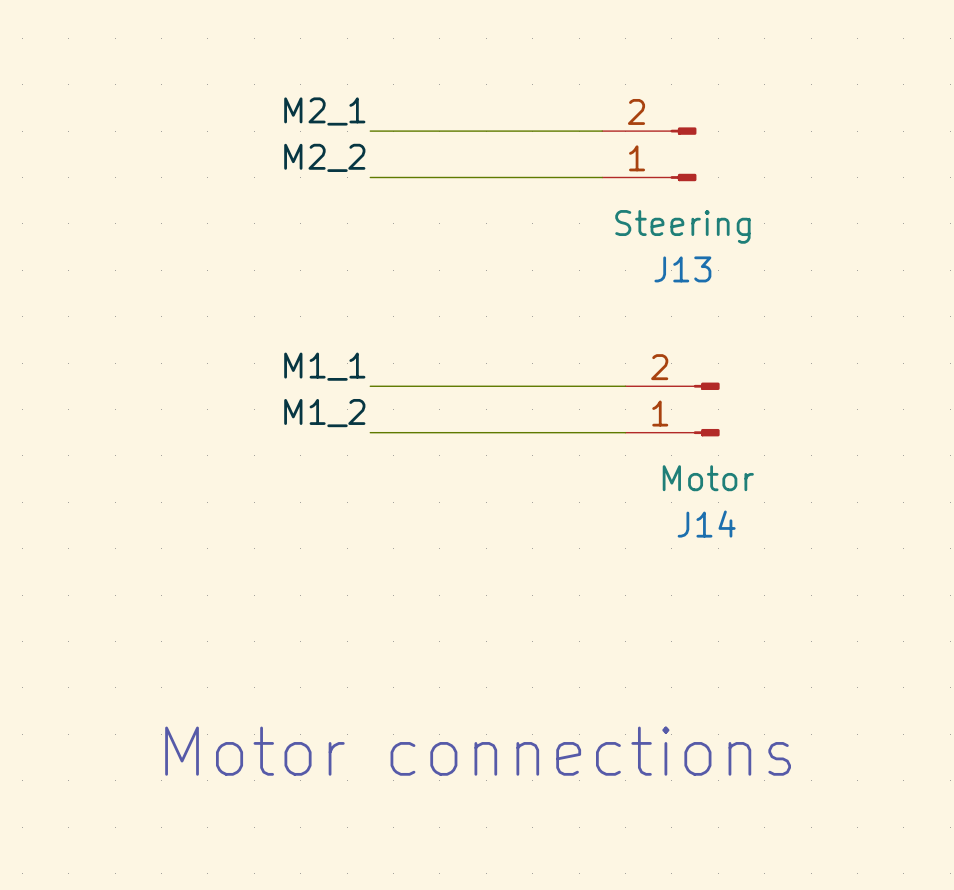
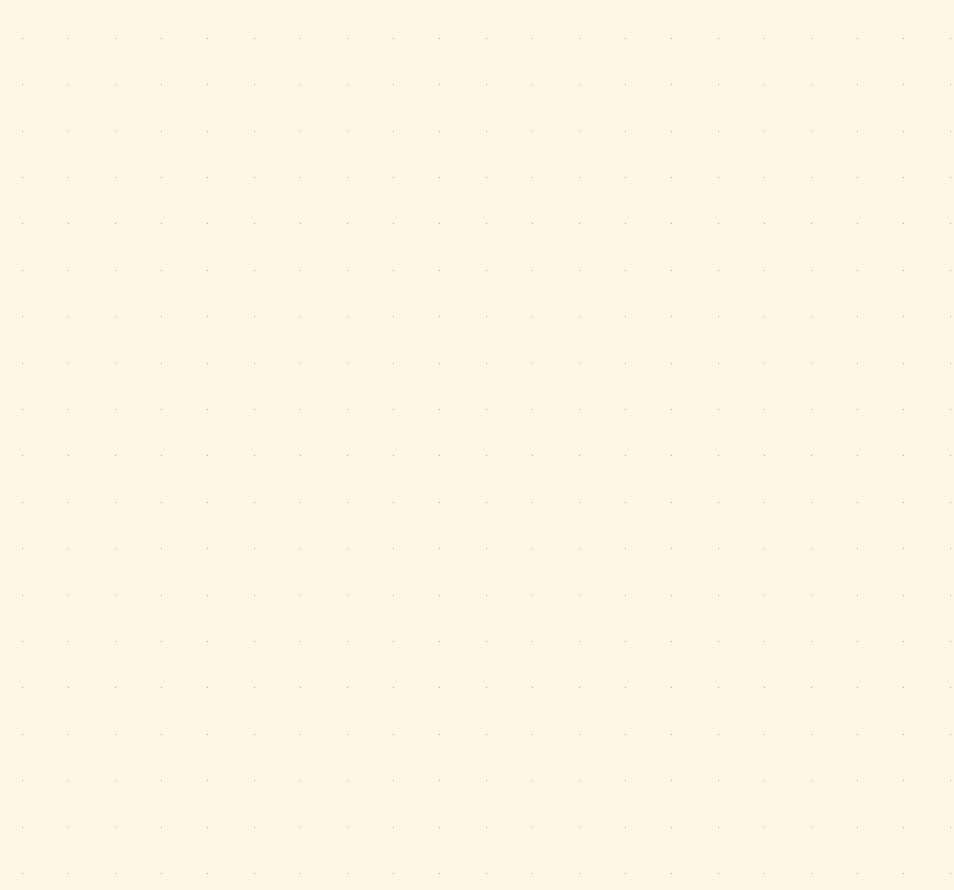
label: M2_1 (324, 111) -> none
wire: (370, 131) (602, 131) -> none
J13: Steering (649, 154) -> none
label: M2_2 (324, 157) -> none
wire: (370, 177) (602, 177) -> none
label: M1_1 (324, 366) -> none
wire: (370, 386) (625, 386) -> none
J14: Motor (672, 409) -> none
label: M1_2 (324, 413) -> none
wire: (370, 432) (625, 432) -> none
text: Motor connections (478, 751) -> none

